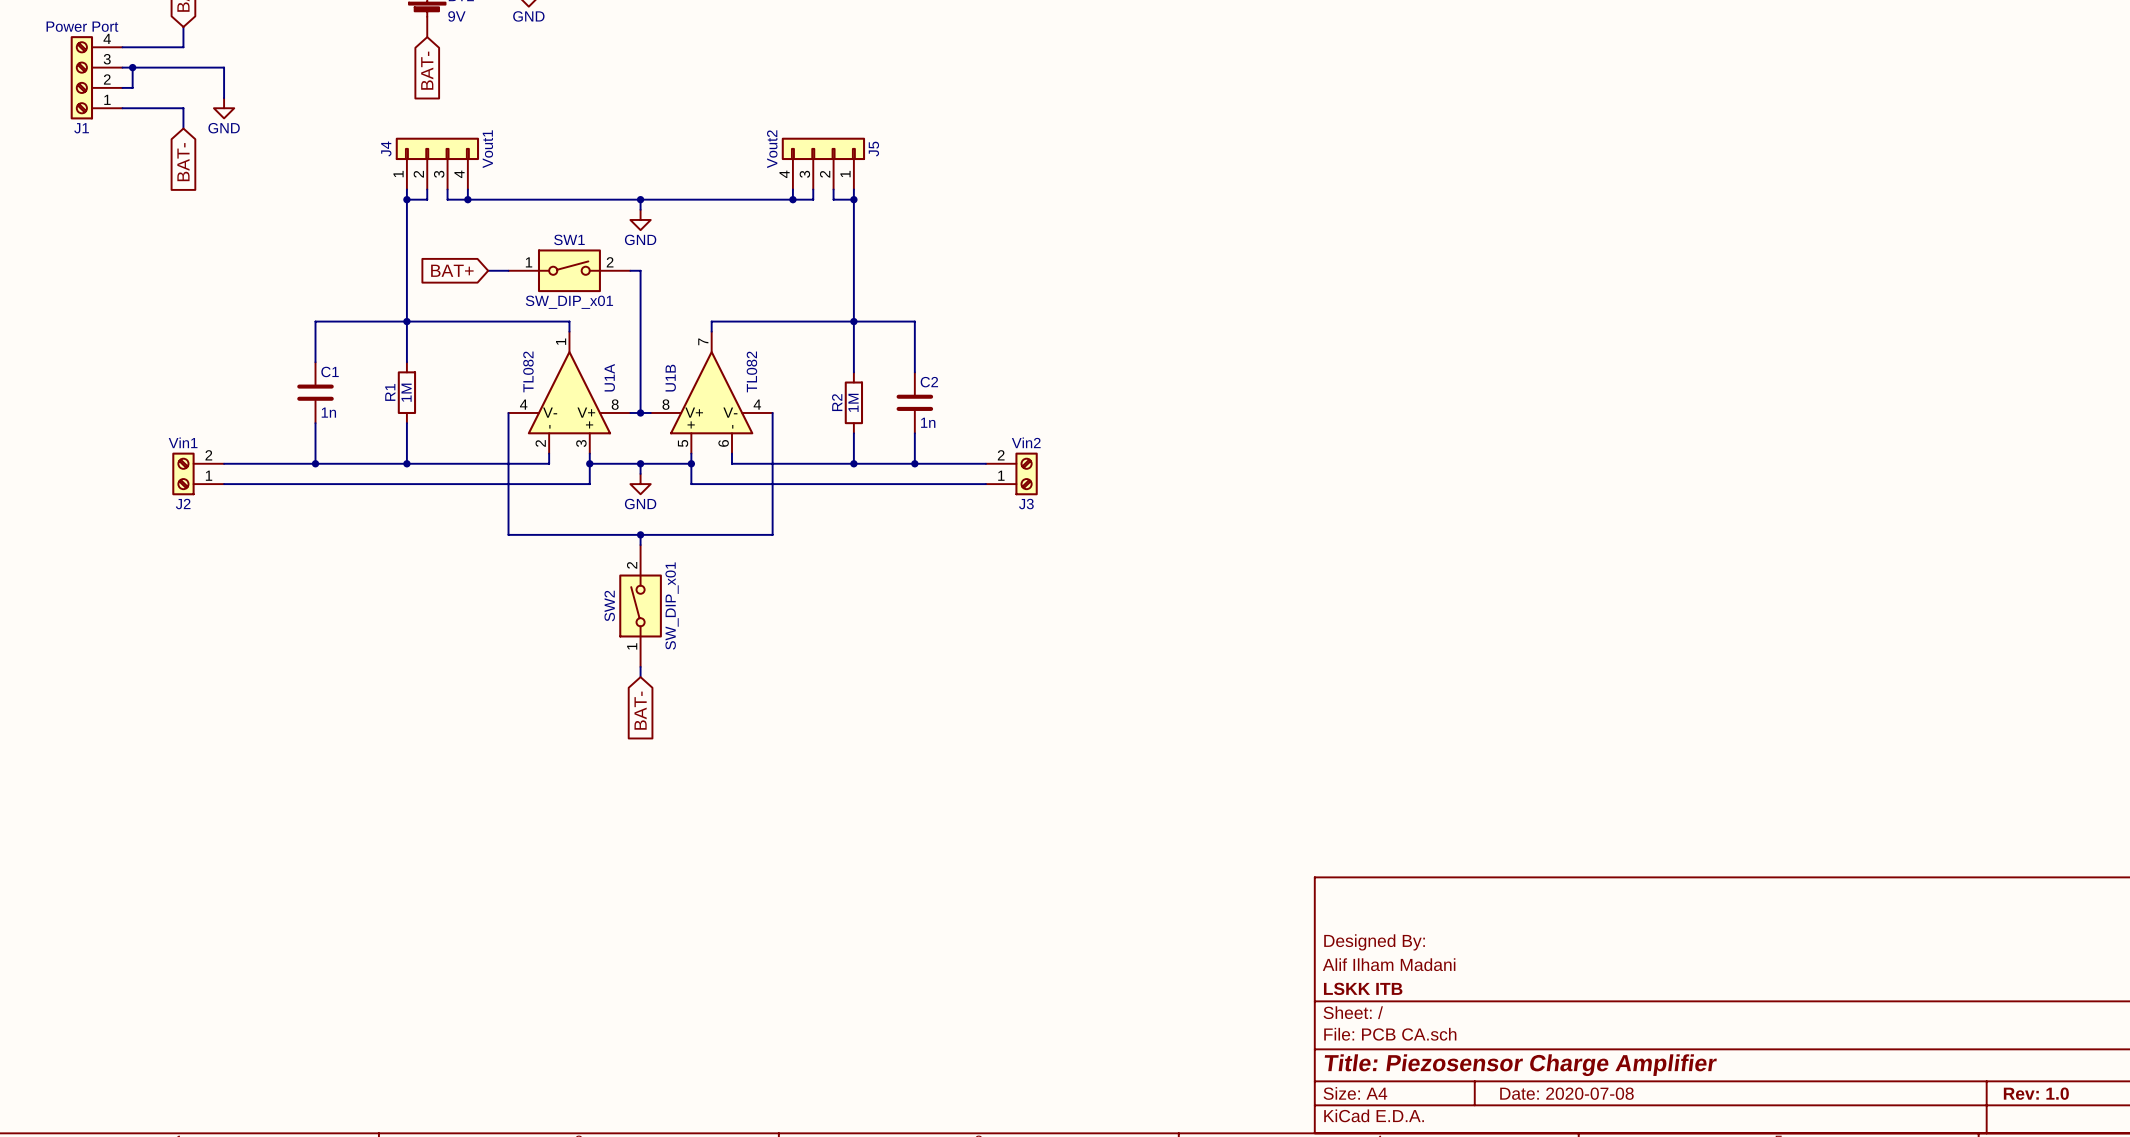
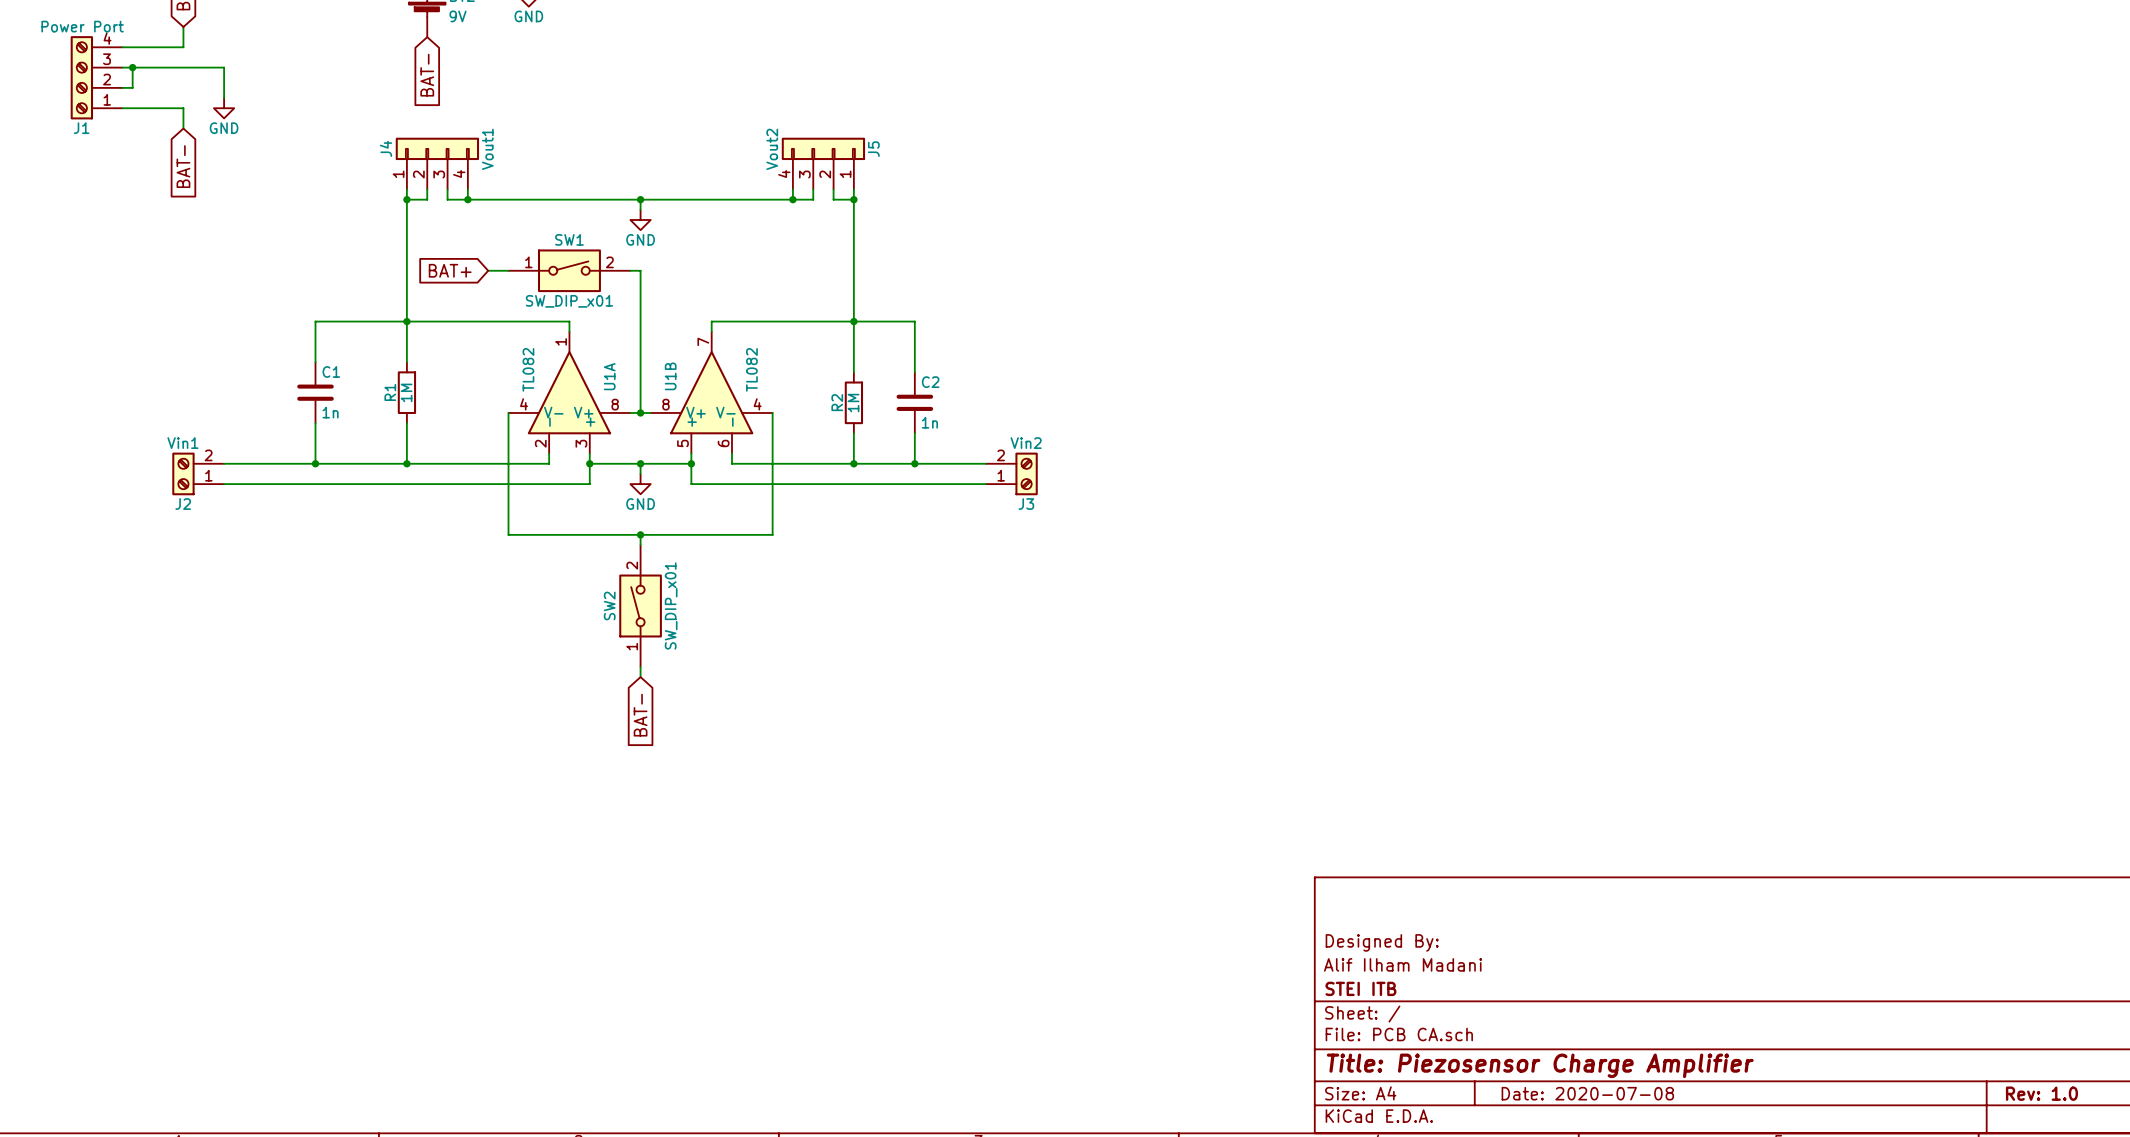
title block: LSKK ITB (1363, 988) -> STEI ITB (1360, 988)

